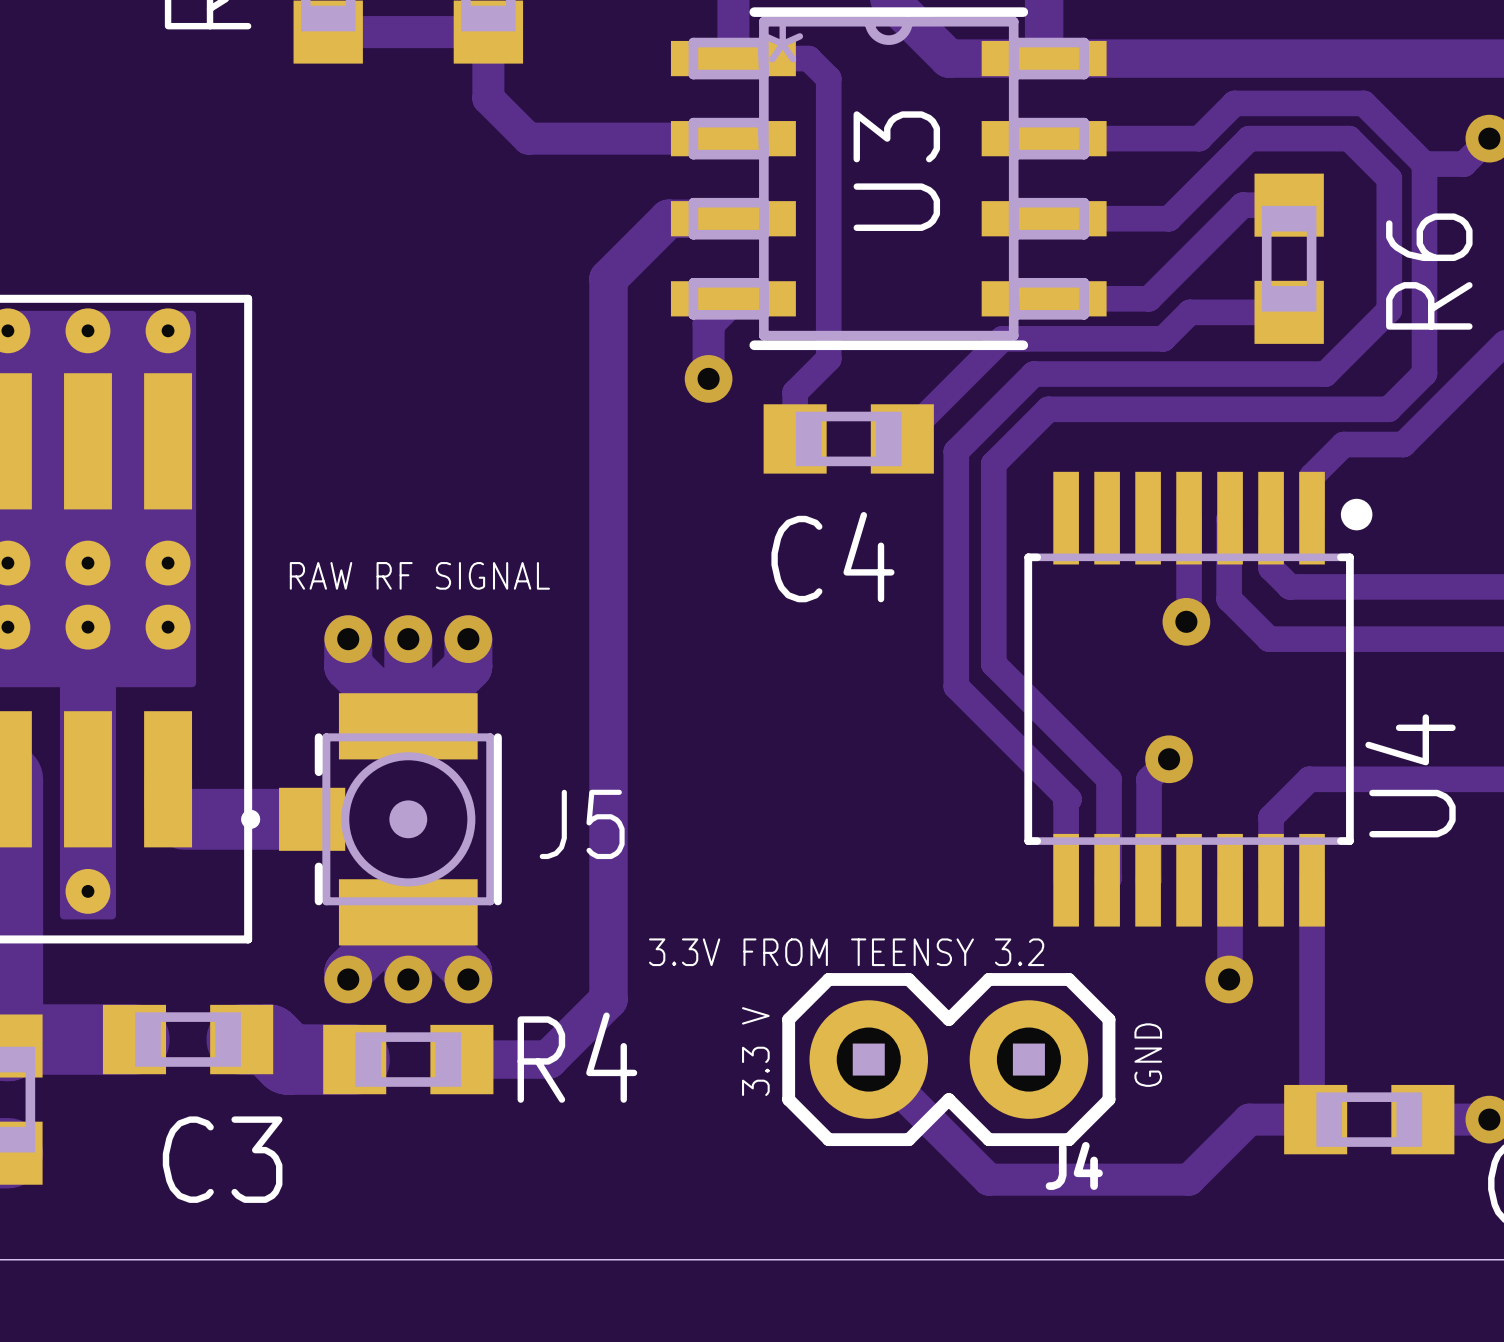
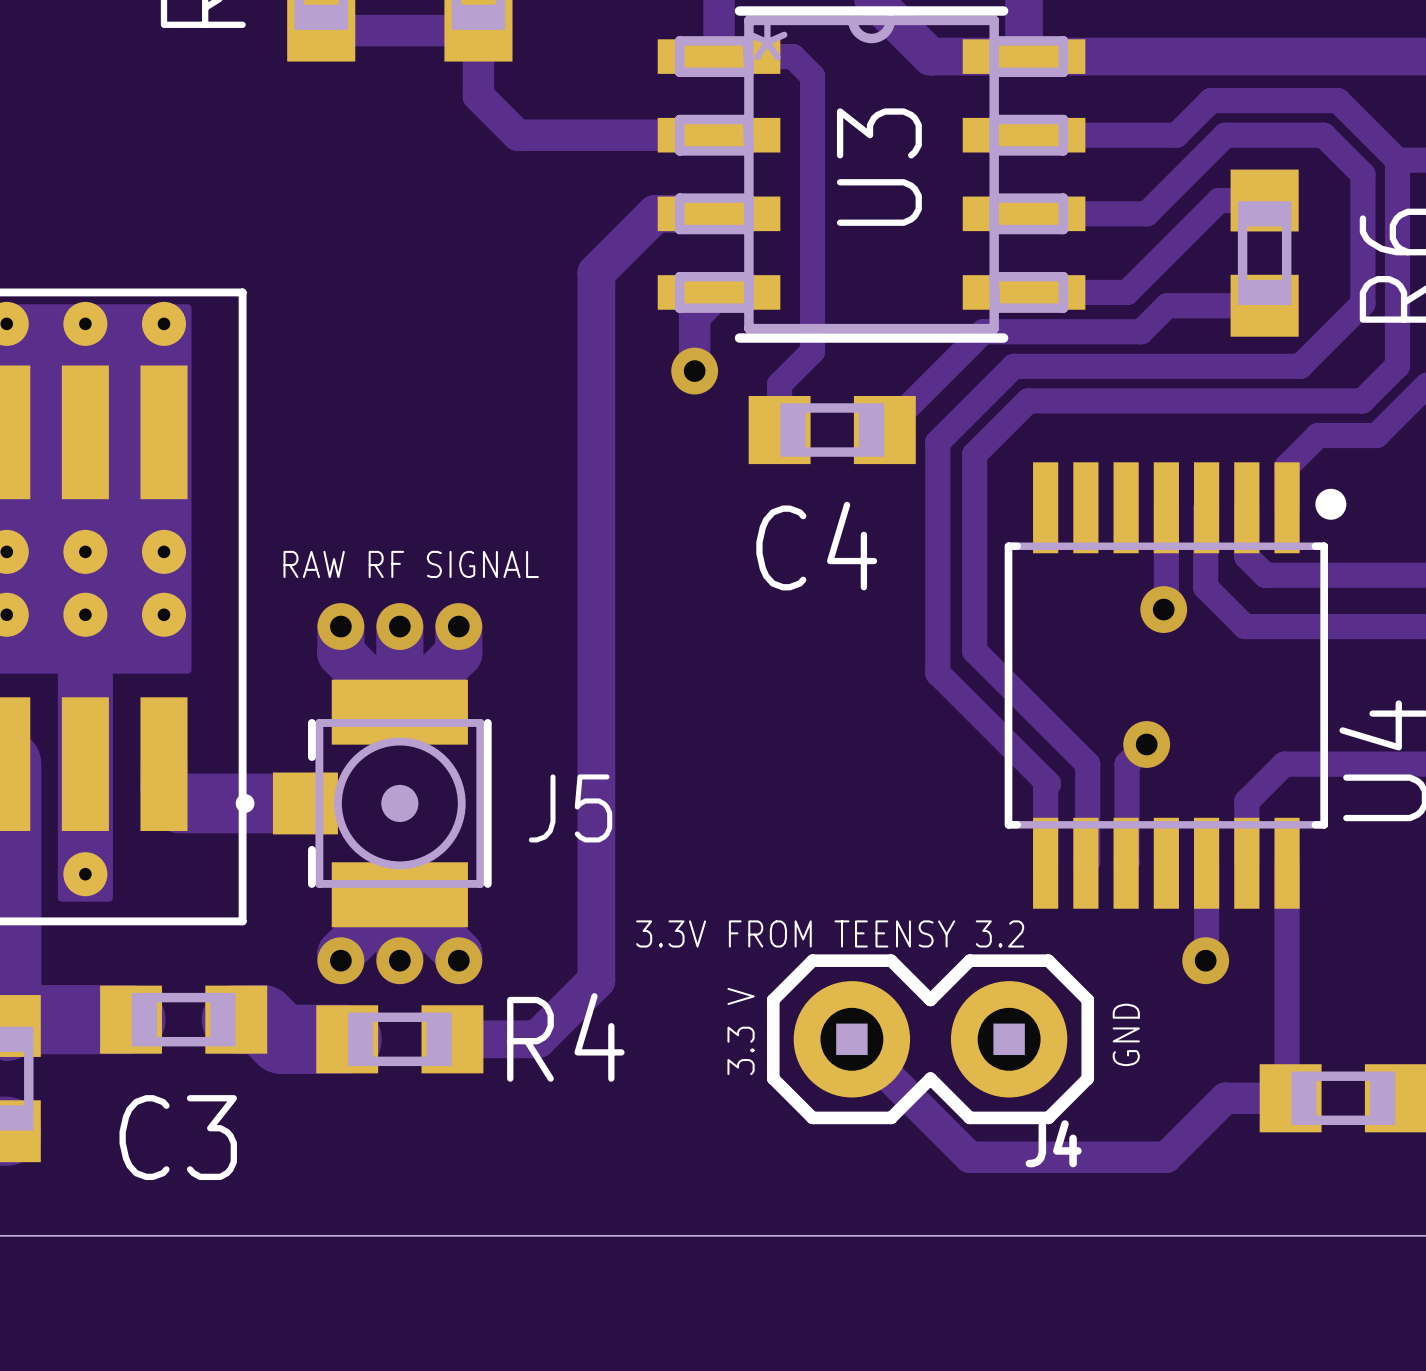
C3 name position: C3 (222, 1159) -> C3 (178, 1137)

